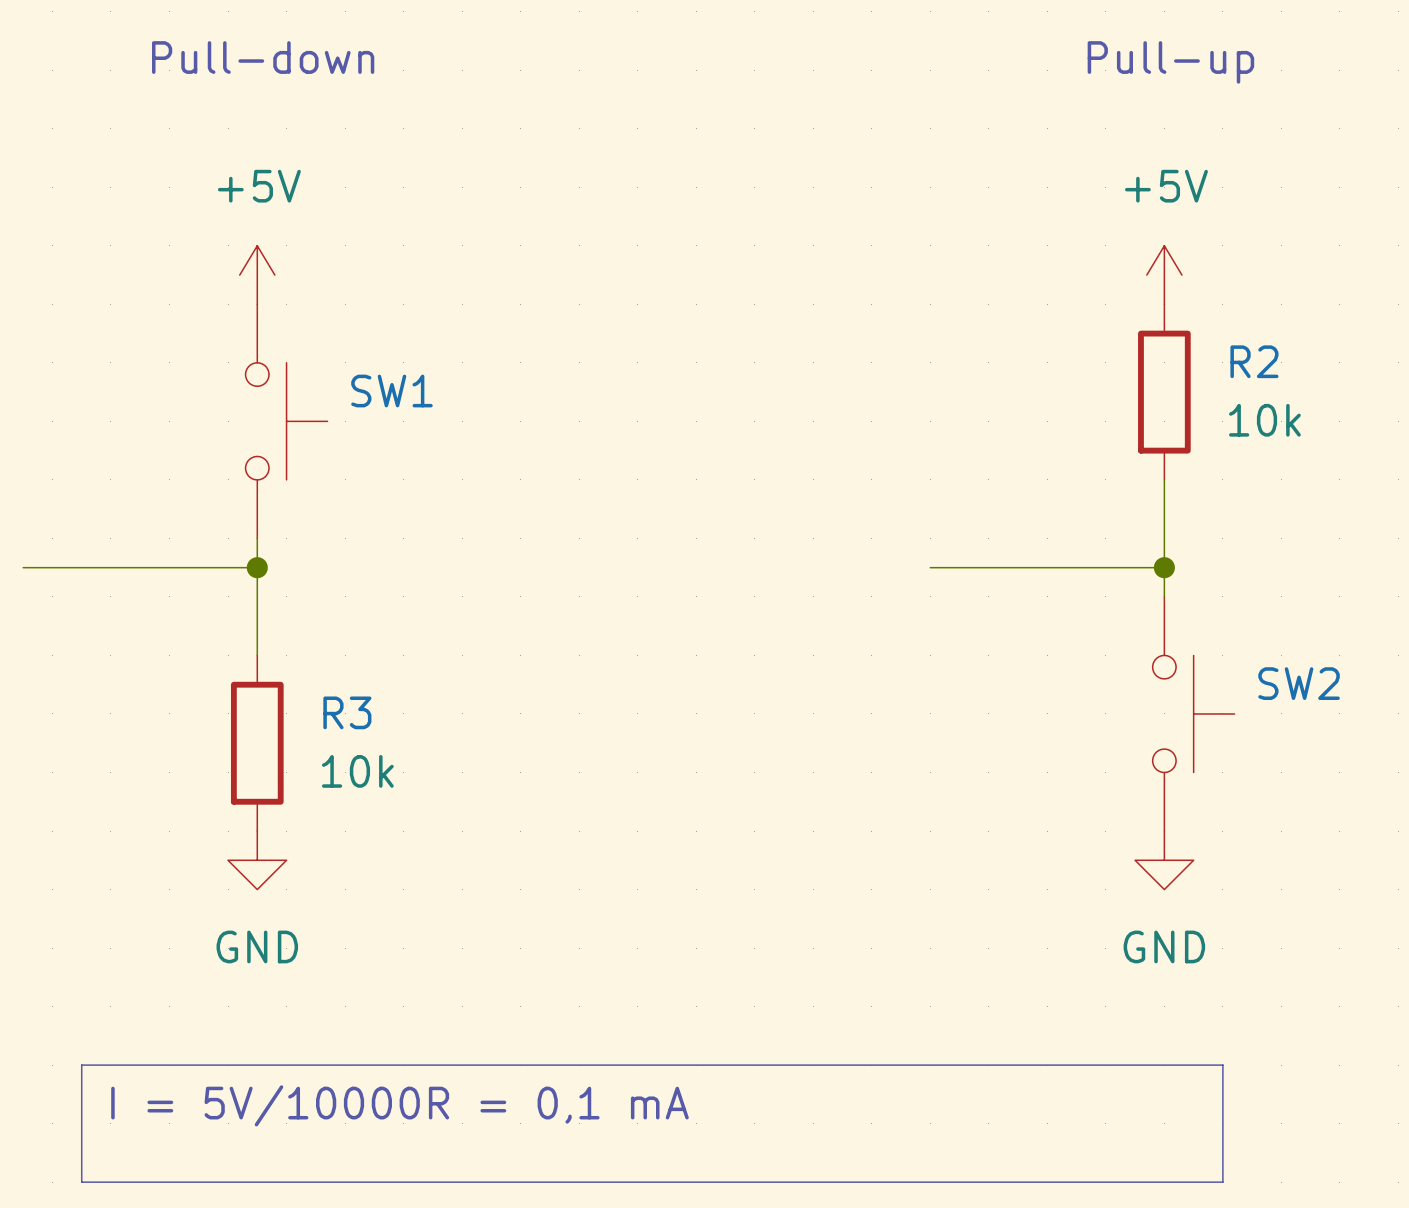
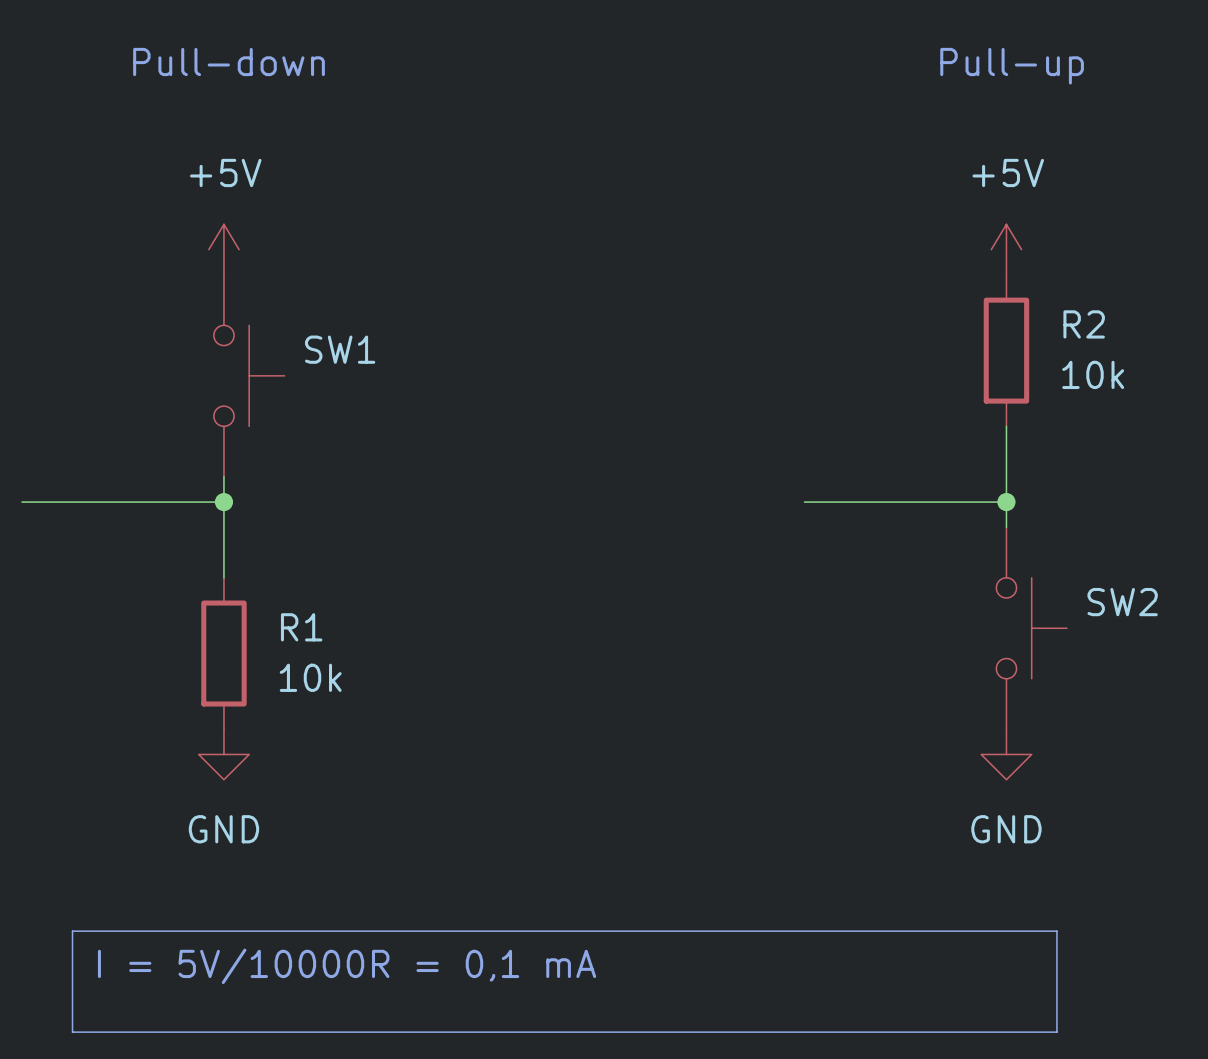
R3 name: R3 (347, 712) -> R1 (301, 627)

